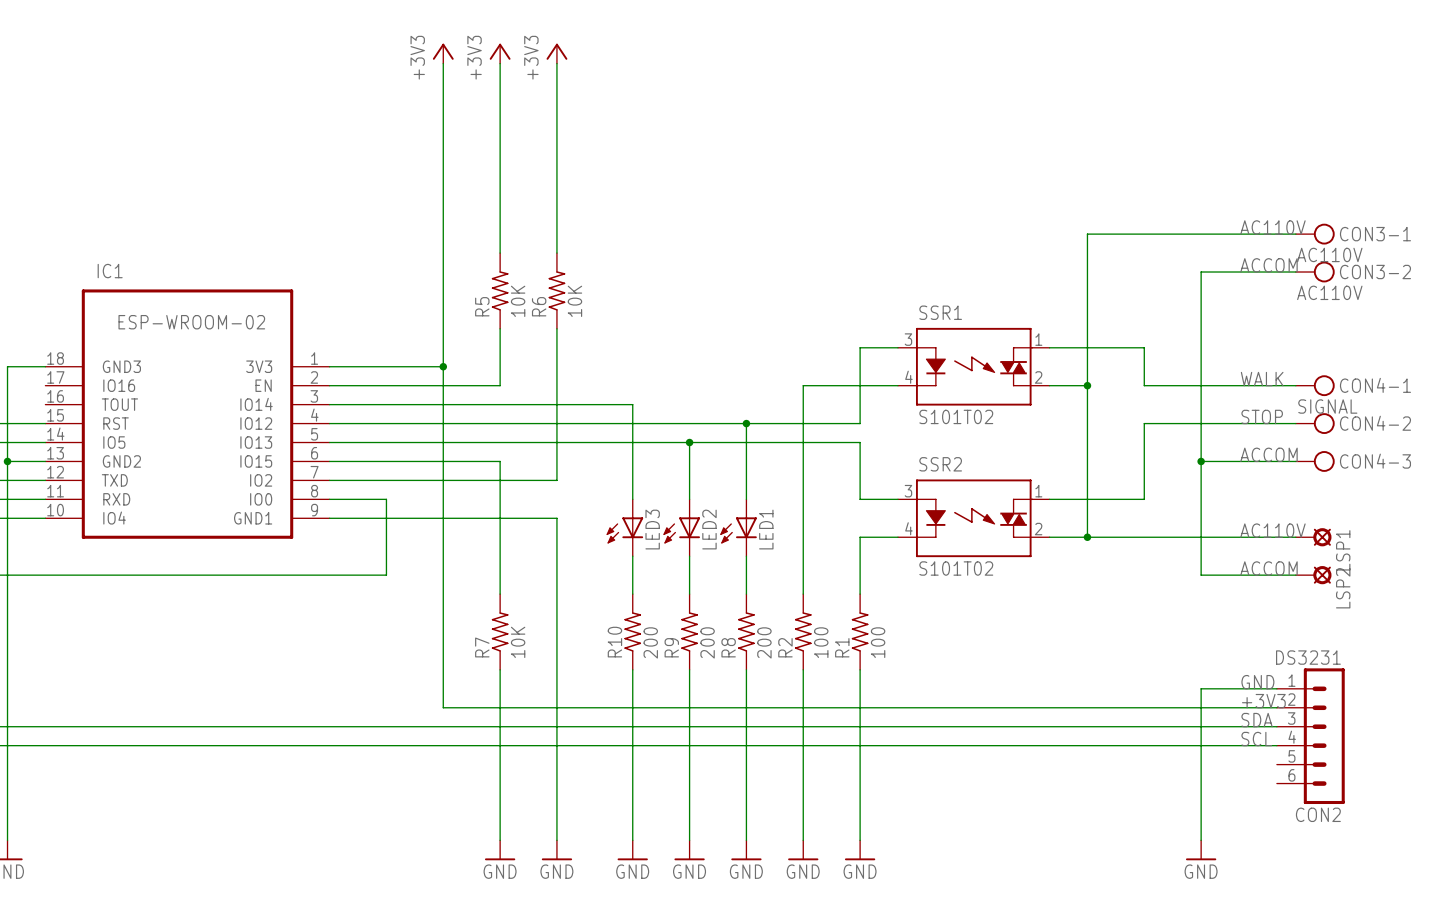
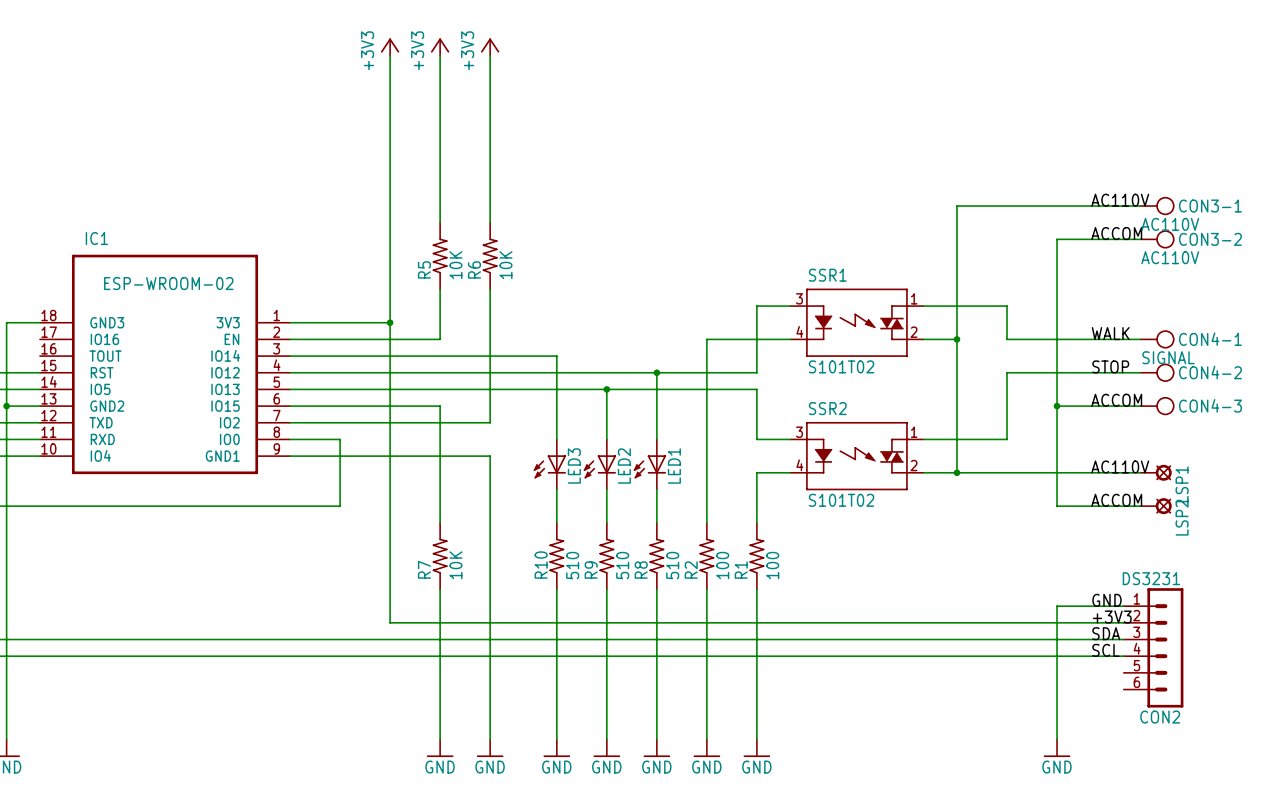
R10 value: 200 (650, 642) -> 510 (572, 565)
R9 value: 200 (707, 642) -> 510 (622, 565)
R8 value: 200 (764, 642) -> 510 (672, 565)

